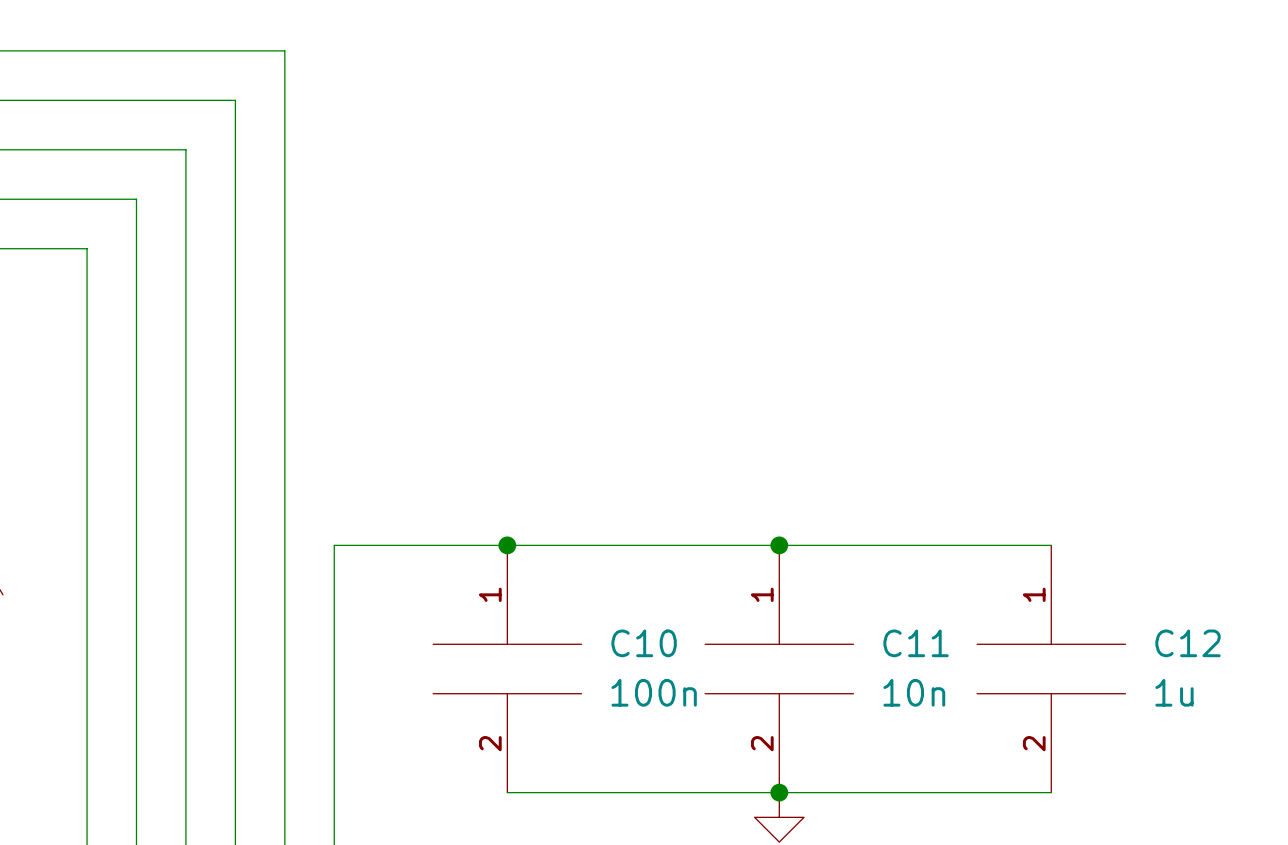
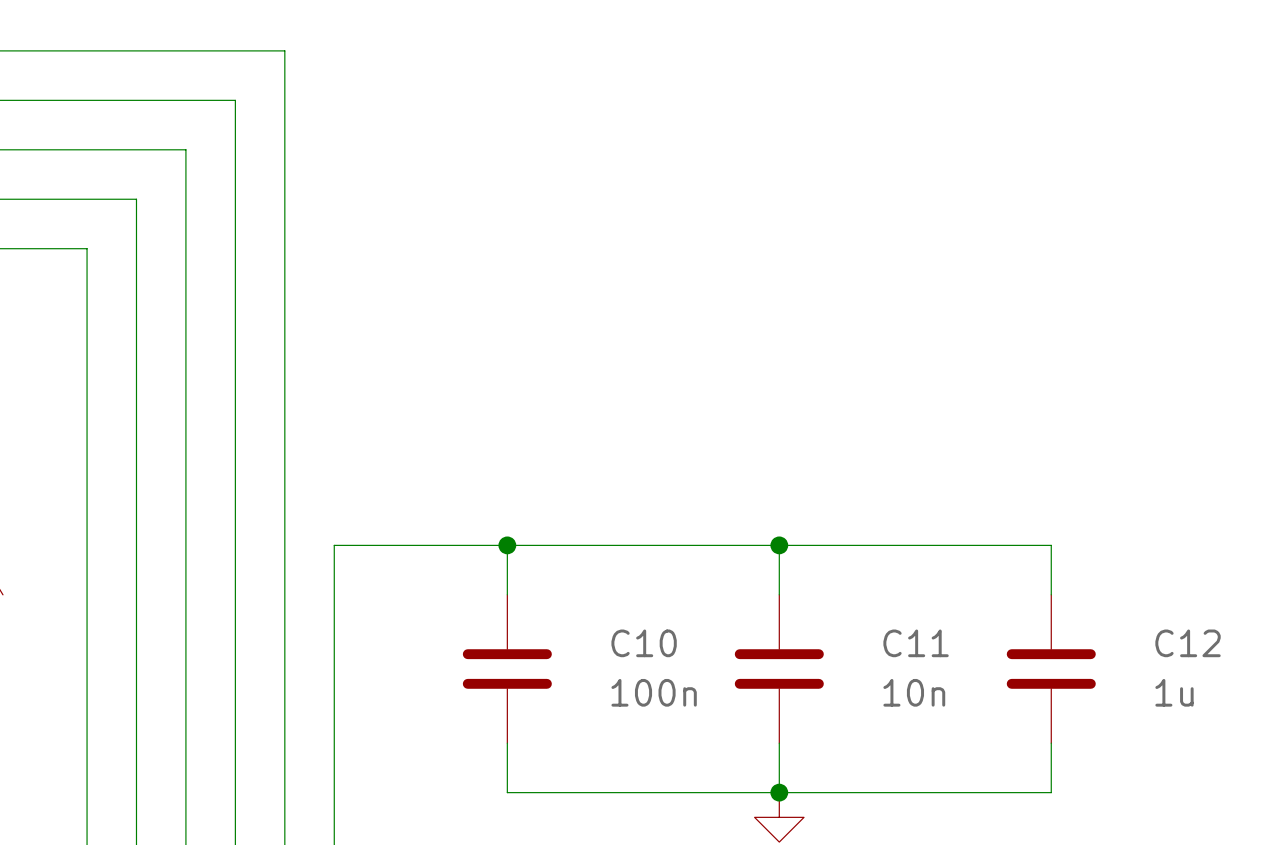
C10 symbol: [433, 545, 582, 793] -> [462, 594, 552, 744]
C11 symbol: [705, 545, 854, 793] -> [734, 594, 824, 744]
C12 symbol: [977, 545, 1126, 793] -> [1006, 594, 1096, 744]

